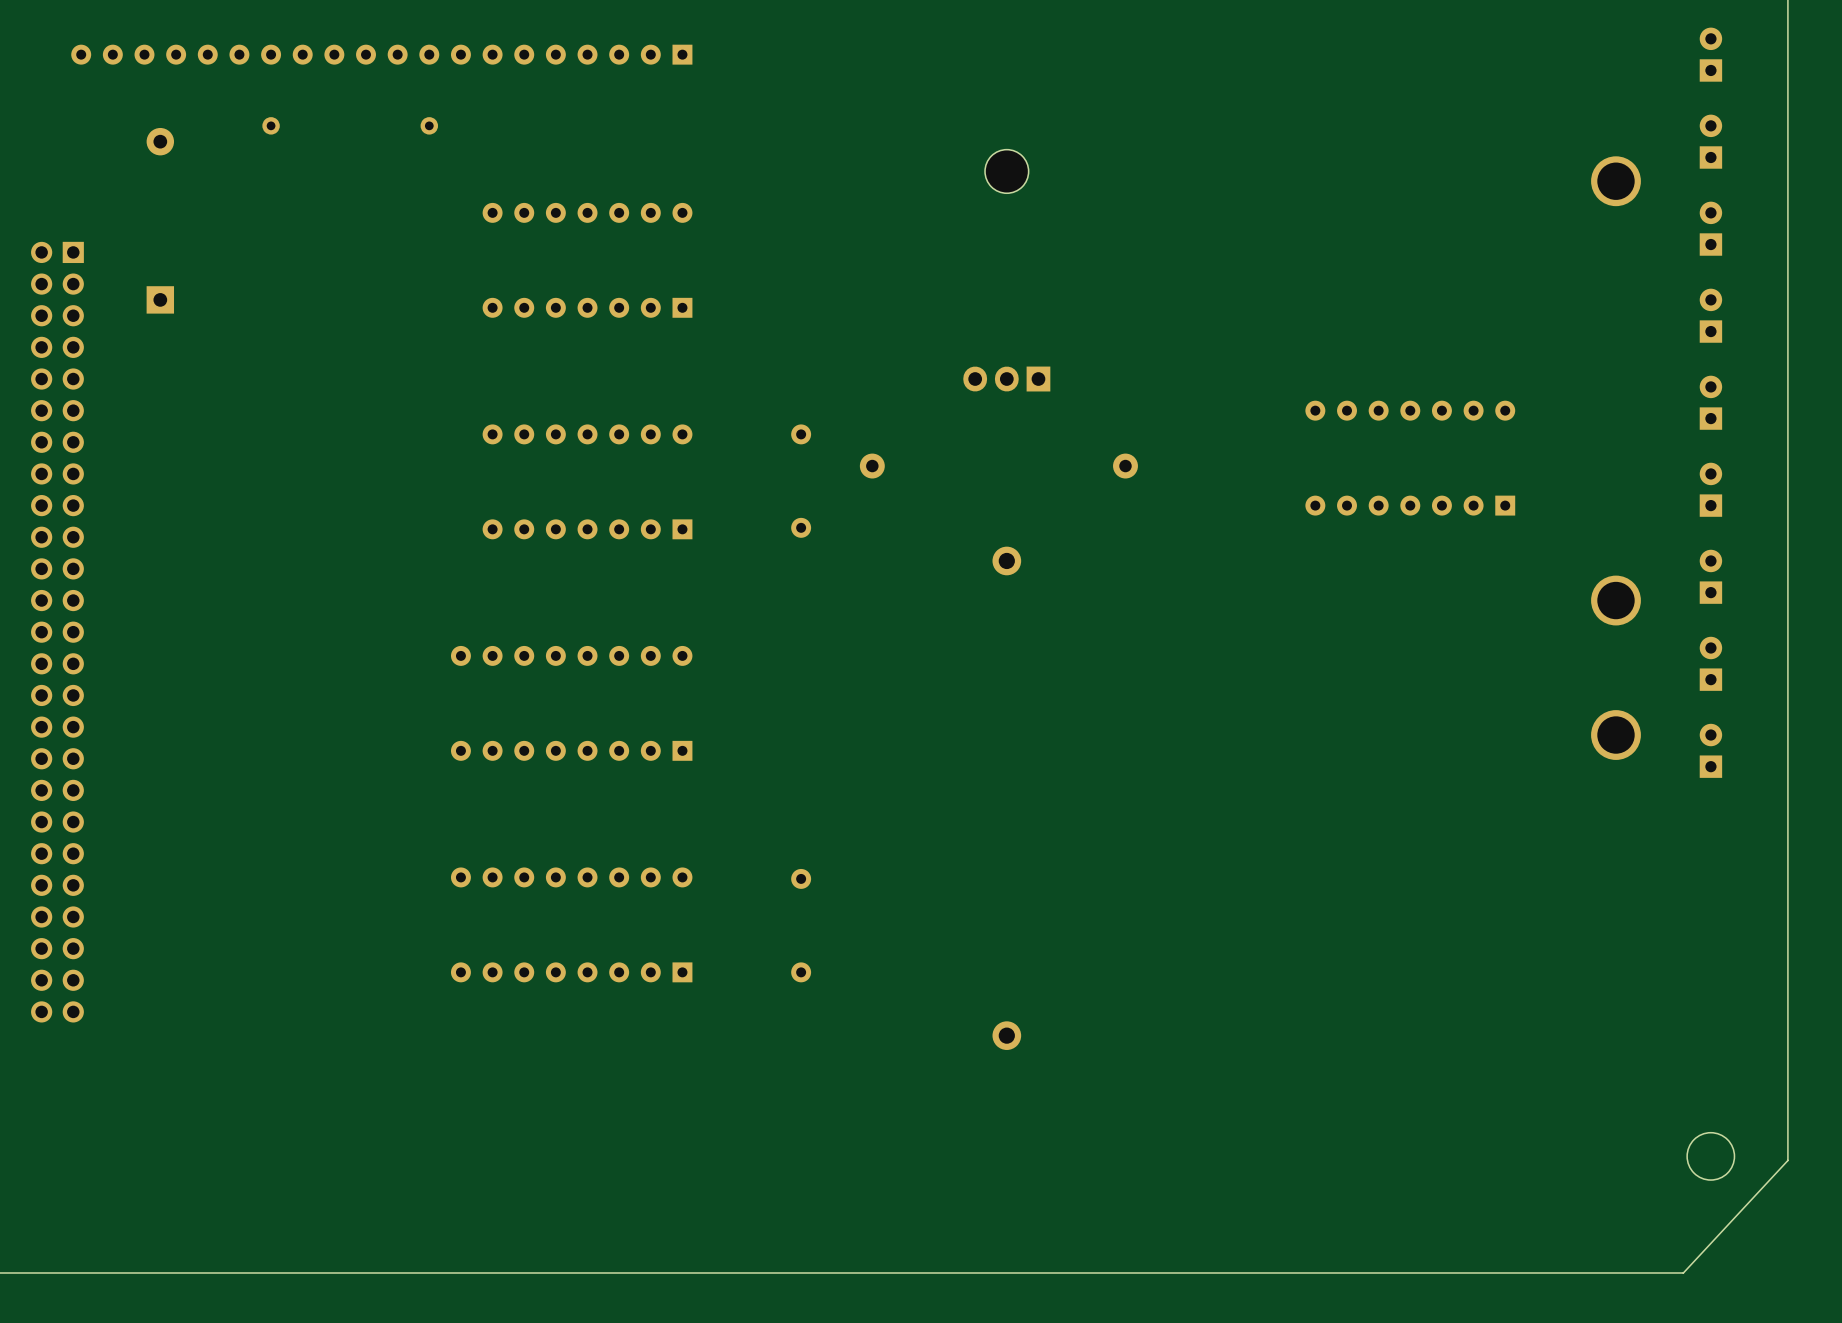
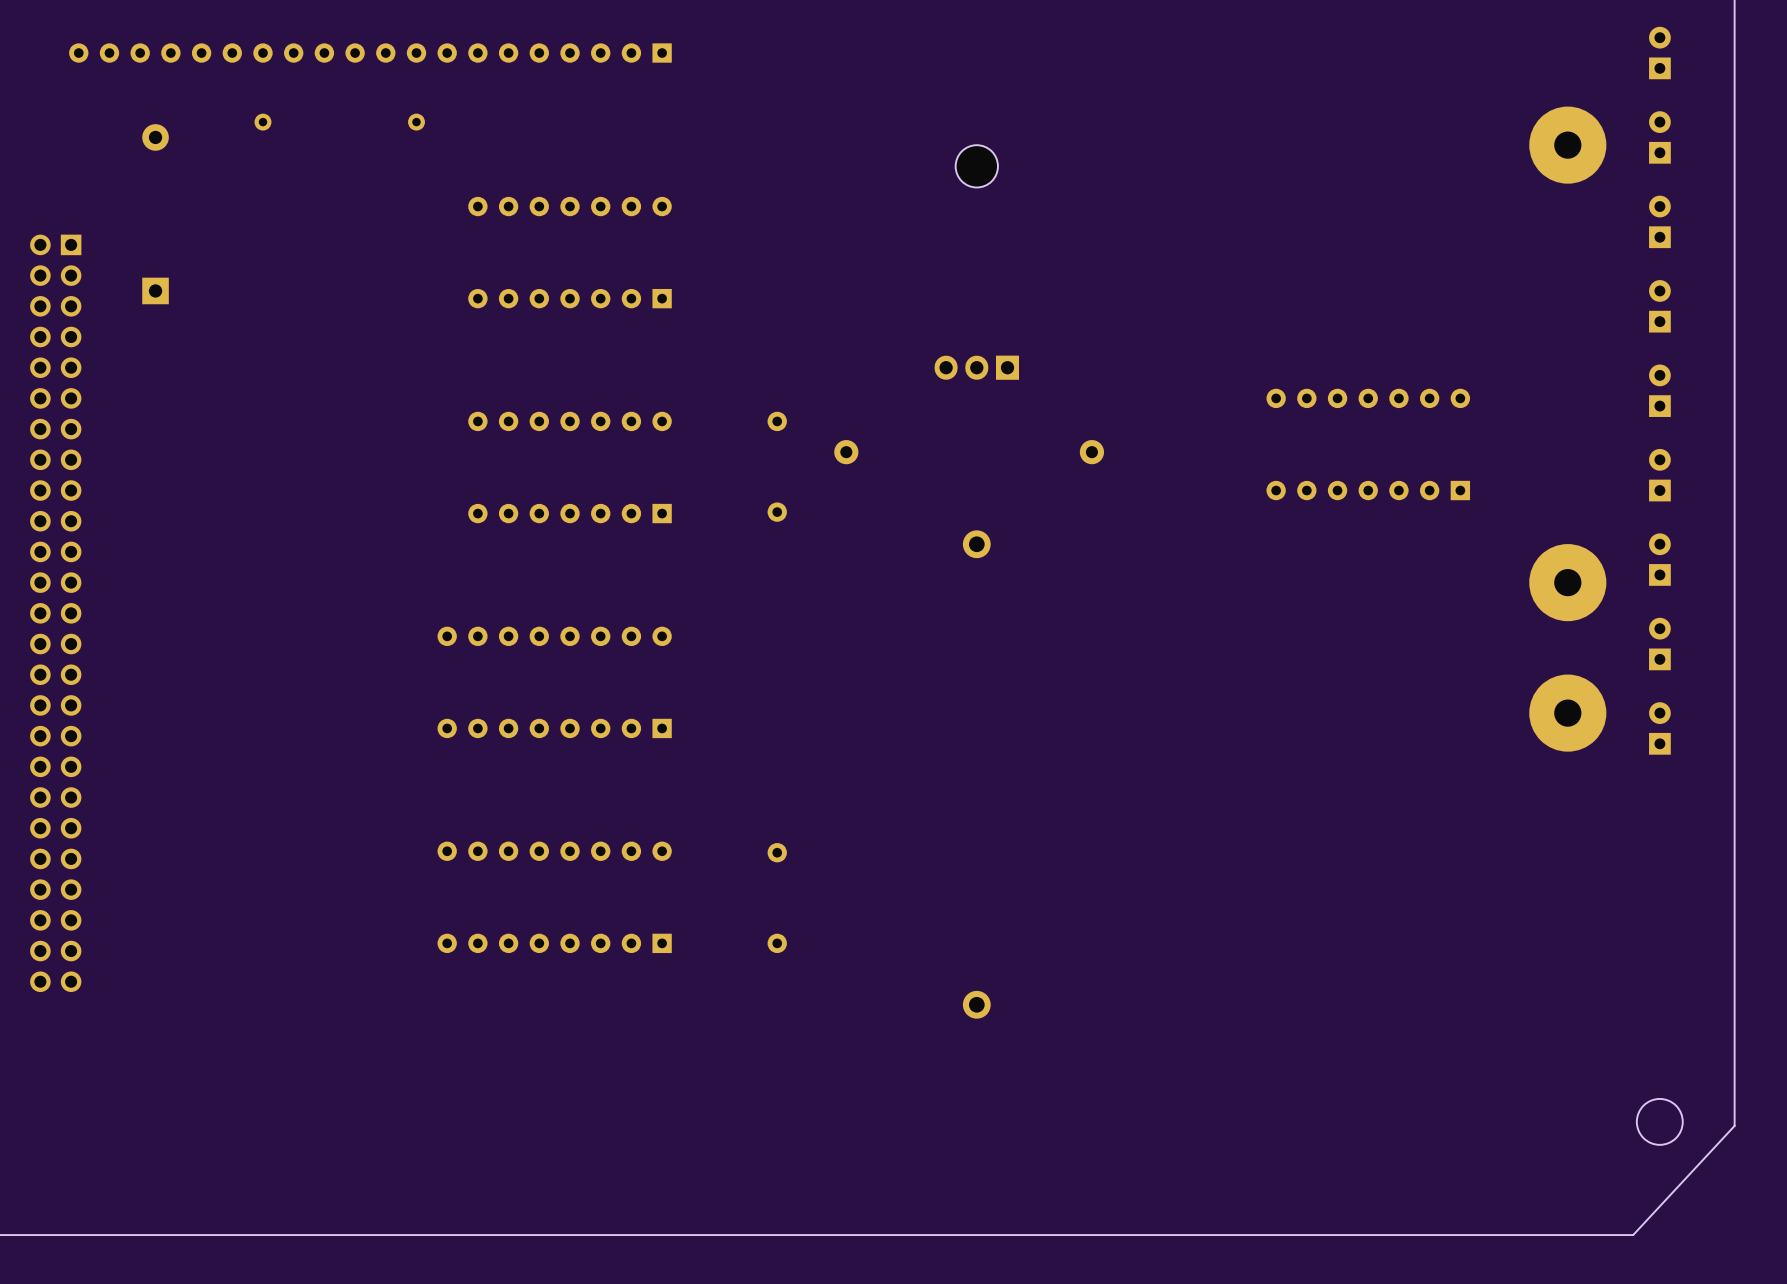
part: none -> (1567, 145)
part: (1615, 181) -> none
part footprint: [1591, 575, 1641, 626] -> [1529, 544, 1607, 622]
part footprint: [1591, 710, 1641, 760] -> [1529, 674, 1607, 752]

